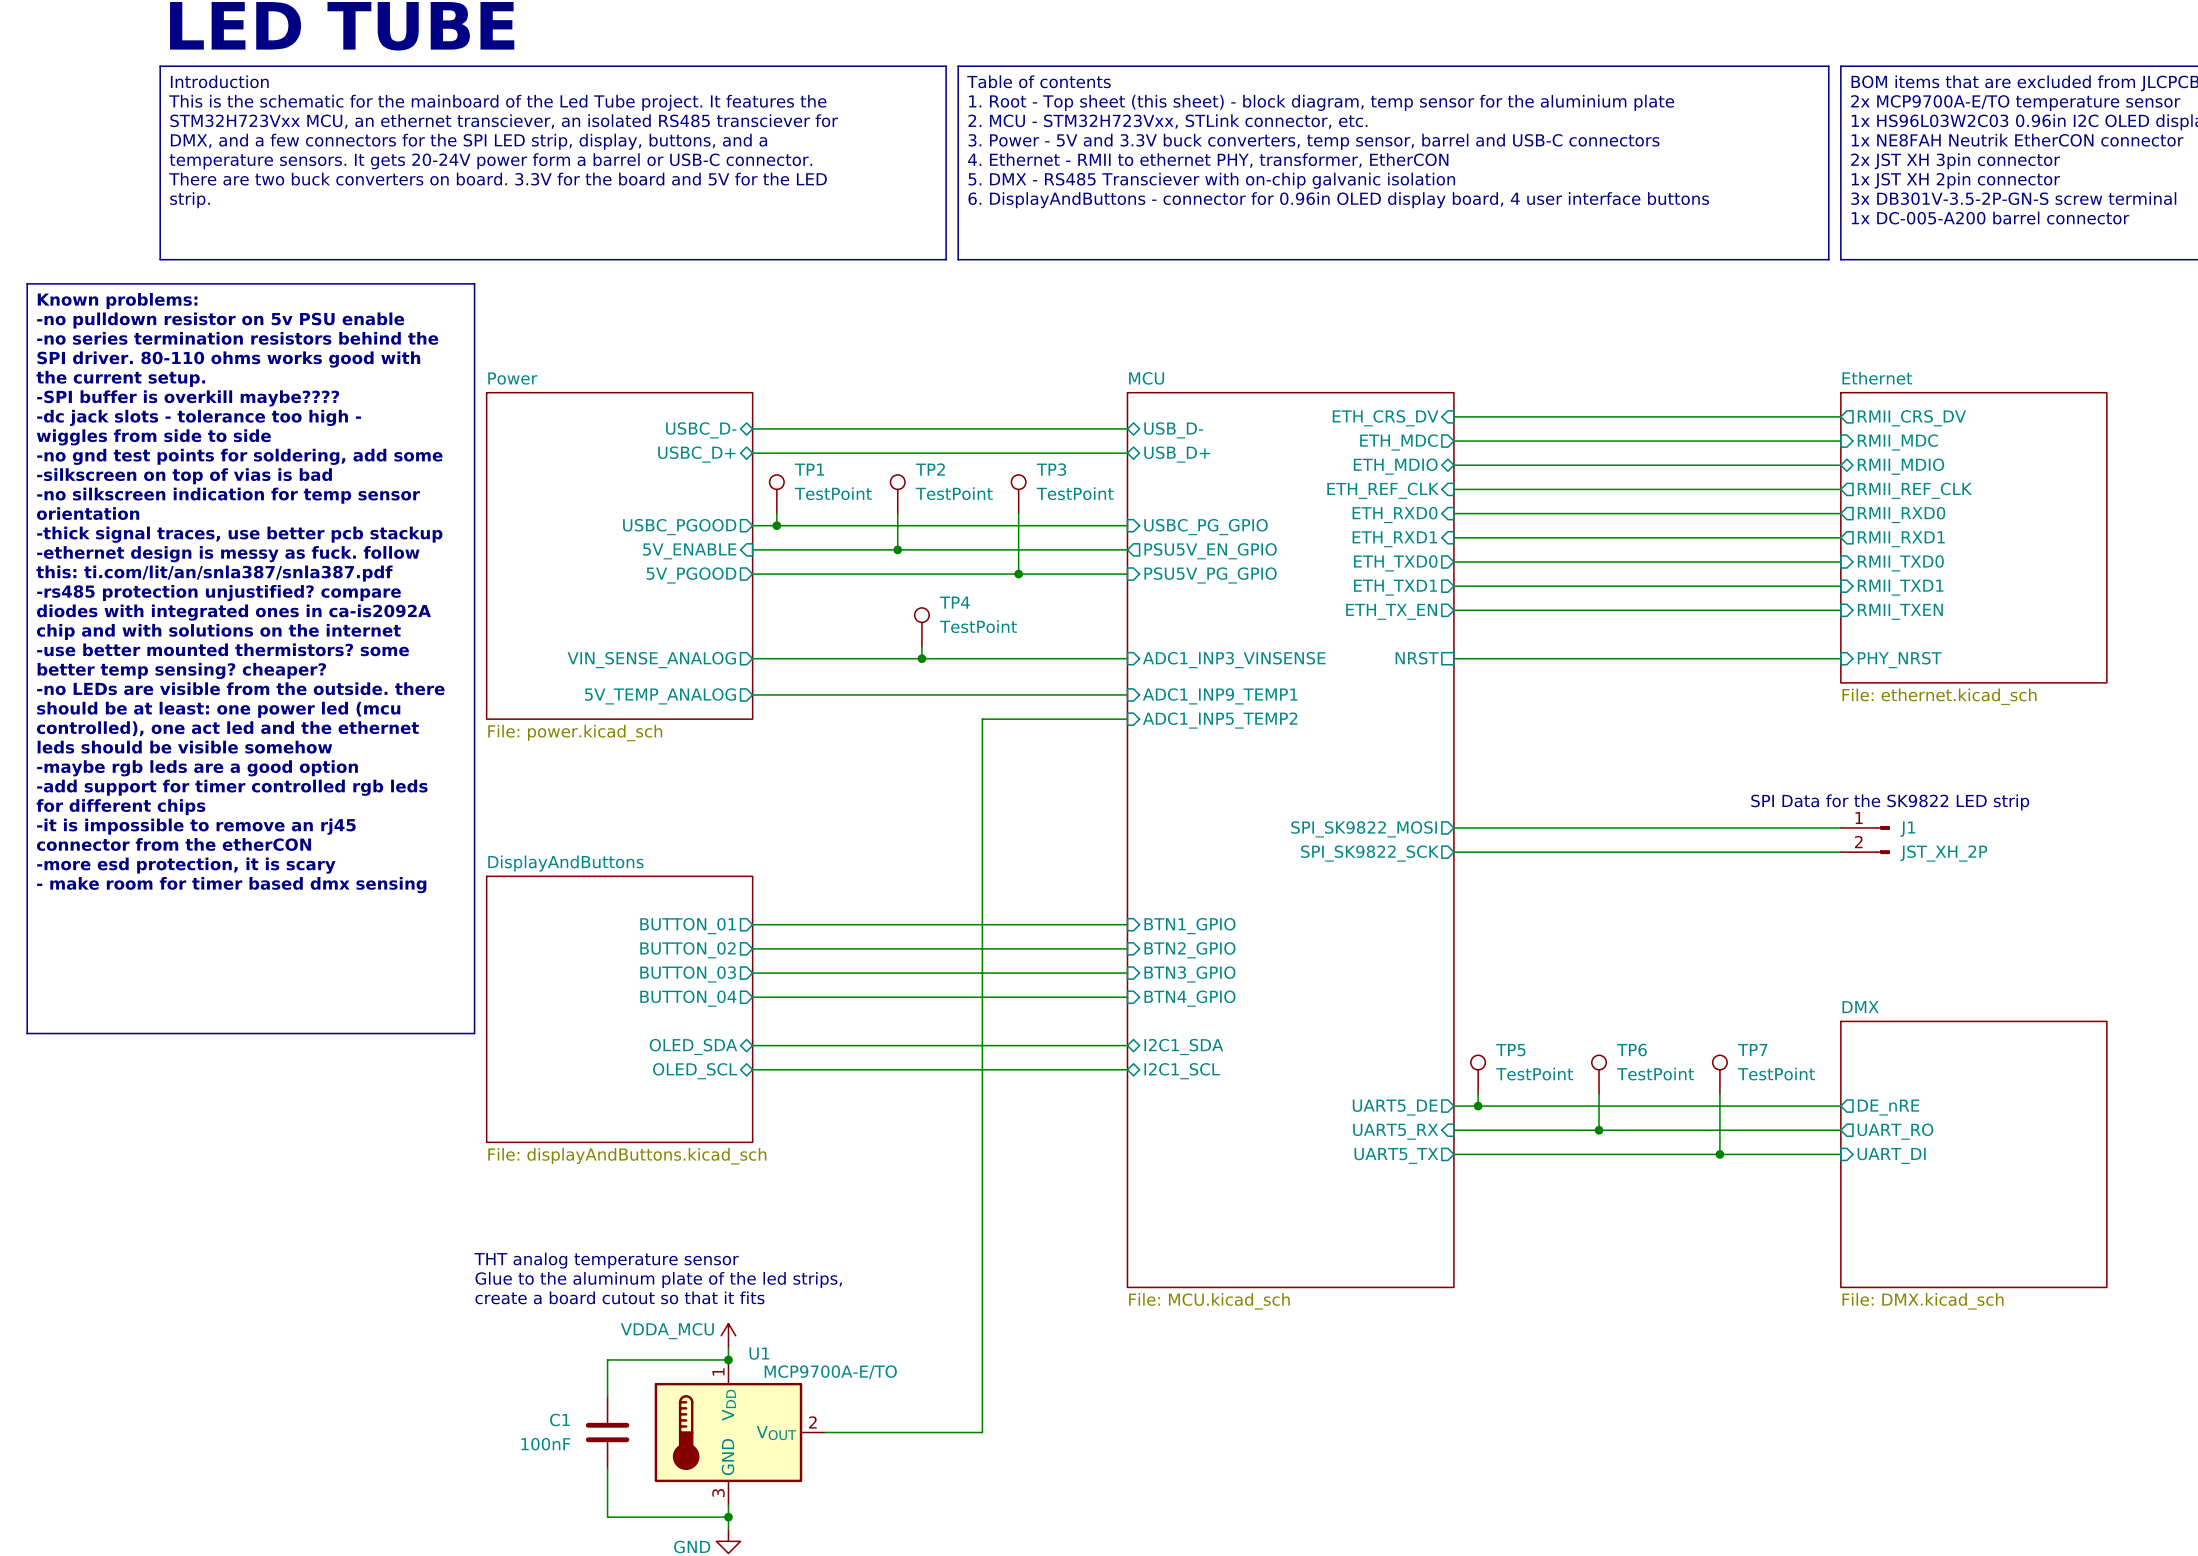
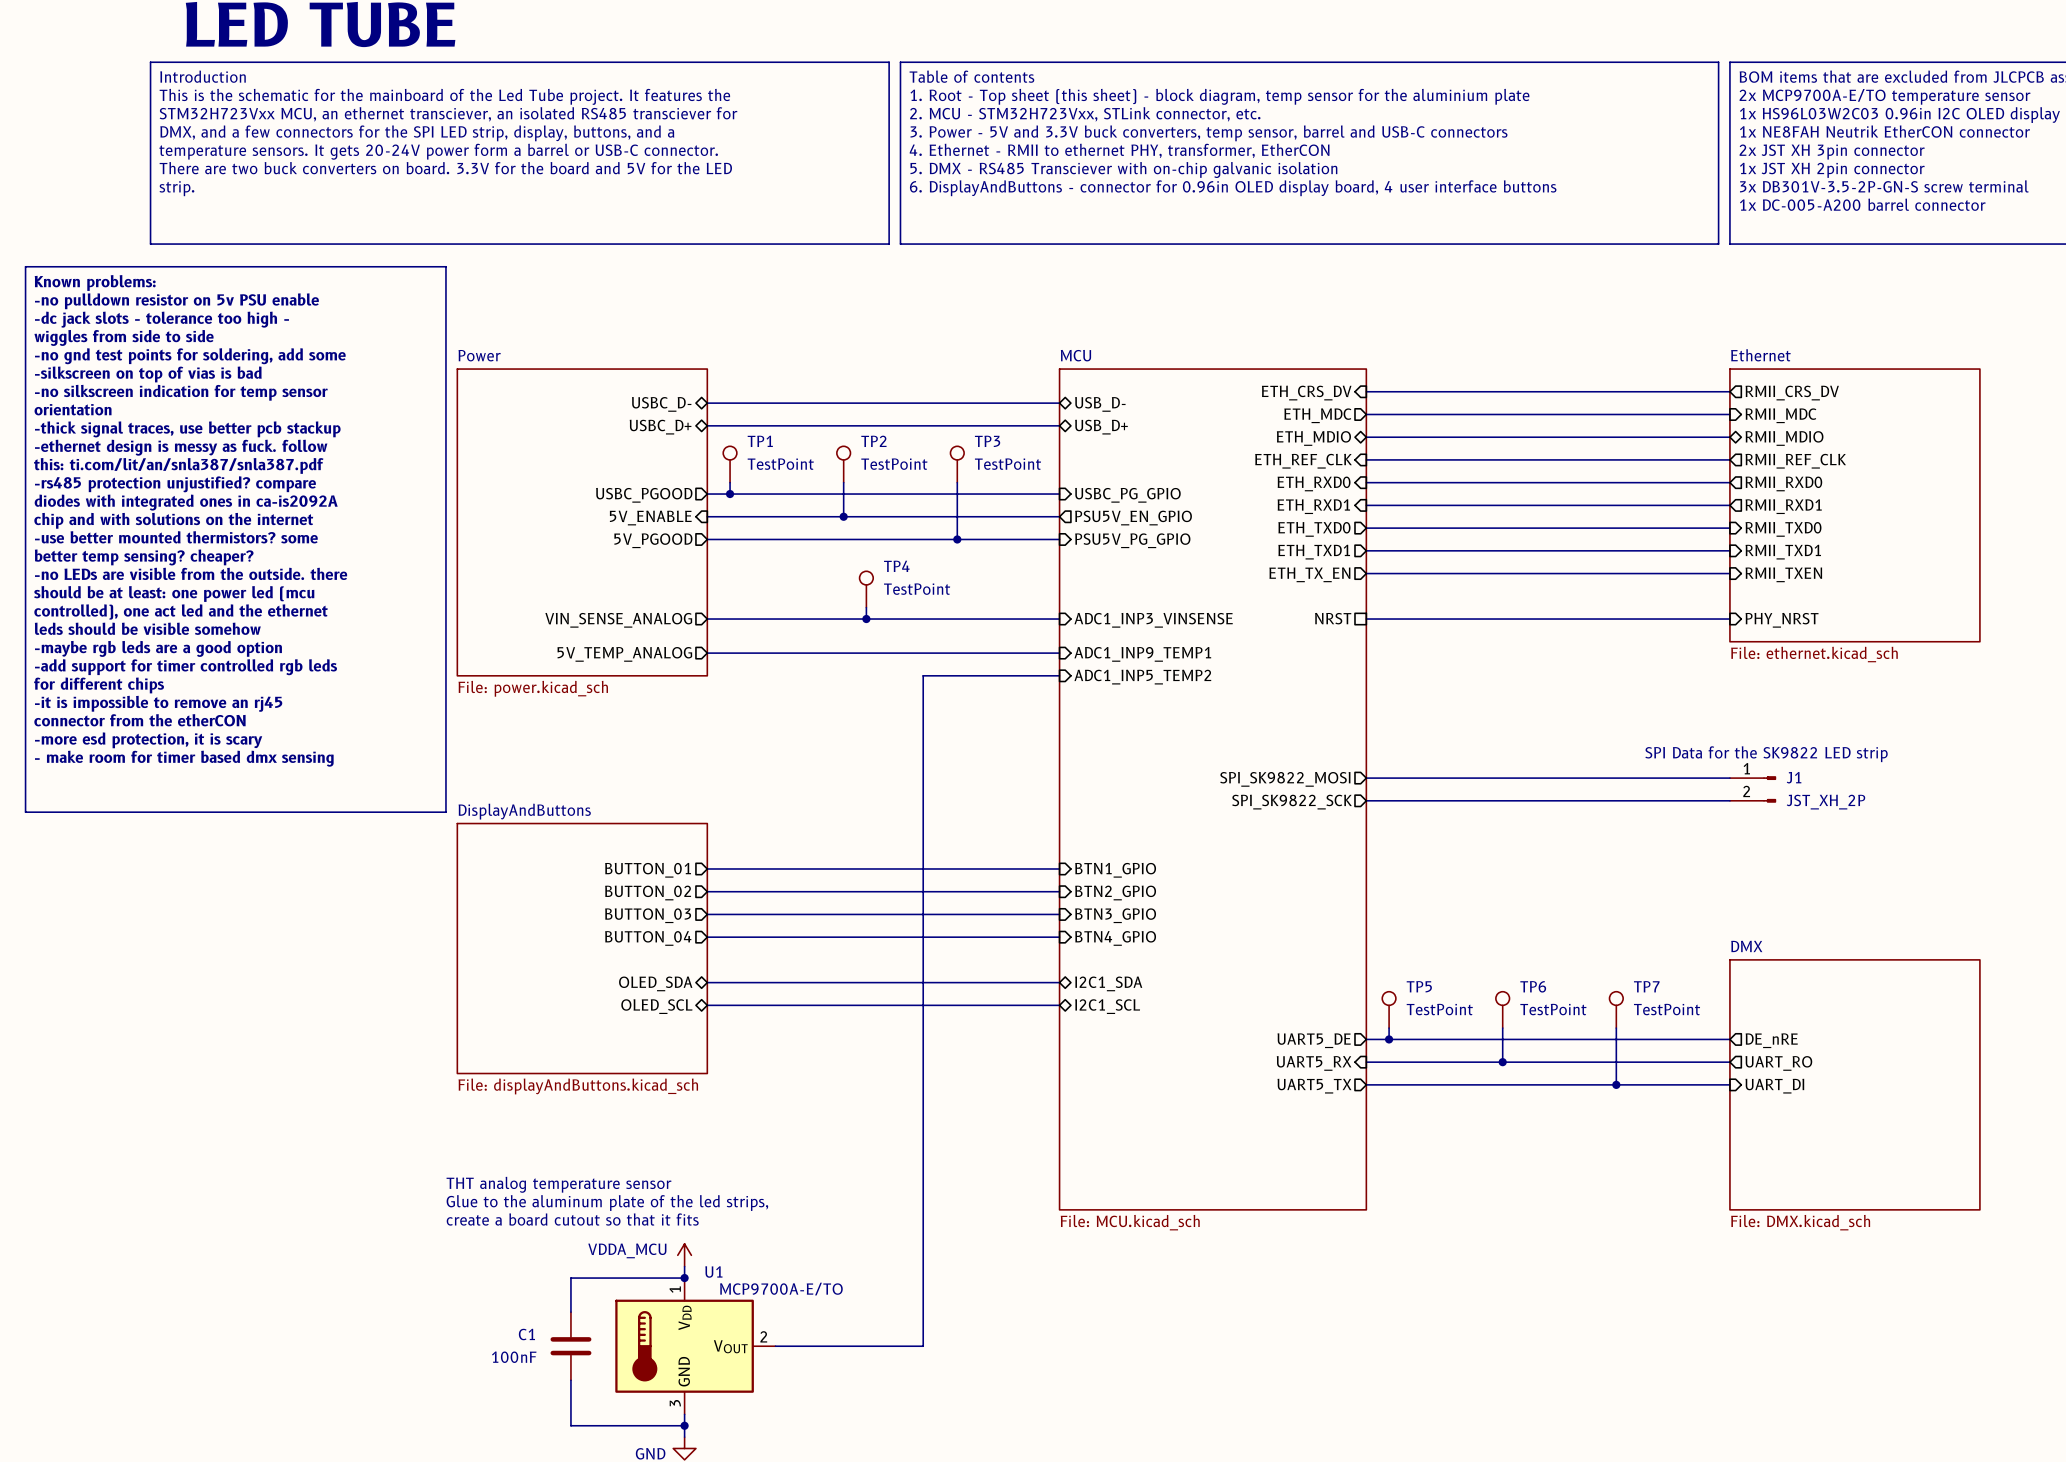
text: -no series termination resistors behind the (237, 338) -> -dc jack slots - tolerance too high - (161, 319)
text: SPI driver. 80-110 ohms works good with (228, 359) -> wiggles from side to side (124, 337)
text: the current setup. (120, 378) -> -no gnd test points for soldering, add some (190, 356)
text: -SPI buffer is overkill maybe???? (188, 398) -> -silkscreen on top of vias is bad (148, 374)
text: -dc jack slots - tolerance too high - (199, 417) -> -no silkscreen indication for temp sensor (181, 392)
text: wiggles from side to side (153, 437) -> orientation (73, 409)
text: -no gnd test points for soldering, add some (239, 456) -> -thick signal traces, use better pcb stackup (187, 429)
text: -silkscreen on top of vias is bad (184, 476) -> -ethernet design is messy as fuck. follow (181, 447)
text: -no silkscreen indication for temp sensor (228, 495) -> this: ti.com/lit/an/snla387/snla387.pdf (178, 465)
text: orientation (88, 513) -> -rs485 protection unjustified? compare (175, 484)
text: -thick signal traces, use better pcb stackup (239, 534) -> diodes with integrated ones in ca-is2092A (186, 502)
text: -ethernet design is messy as fuck. follow (228, 554) -> chip and with solutions on the internet (173, 520)
text: this: ti.com/lit/an/snla387/snla387.pdf (214, 573) -> -use better mounted thermistors? some (176, 537)
text: -rs485 protection unjustified? compare (218, 593) -> better temp sensing? cheaper? (144, 557)
text: diodes with integrated ones in ca-is2092A (233, 612) -> -no LEDs are visible from the outside. there (191, 573)
text: chip and with solutions on the internet (218, 631) -> should be at least: one power led (mcu (174, 593)
text: -use better mounted thermistors? some (223, 649) -> controlled), one act led and the ethernet (181, 611)
text: better temp sensing? cheaper? (181, 670) -> leds should be visible somehow (147, 628)
text: -no LEDs are visible from the outside. there (240, 688) -> -maybe rgb leds are a good option (158, 648)
text: should be at least: one power led (mcu (218, 709) -> -add support for timer controlled rgb leds (186, 667)
text: controlled), one act led and the ethernet (227, 728) -> for different chips (99, 685)
text: leds should be visible somehow (184, 747) -> -it is impossible to remove an rj45 (158, 703)
text: -maybe rgb leds are a good option (197, 768) -> connector from the etherCON (139, 720)
text: -add support for timer controlled rgb leds (232, 787) -> -more esd protection, it is scary (148, 740)
text: for different chips (120, 807) -> - make room for timer based dmx sensing (184, 758)
text: -it is impossible to remove an rj45 (196, 826) -> none
text: connector from the etherCON (174, 844) -> none
line: (27, 864) (27, 1033) (474, 1033) (474, 864) -> (25, 812) (445, 812)
text: -more esd protection, it is scary (186, 865) -> none
text: - make room for timer based dmx sensing (231, 885) -> none

